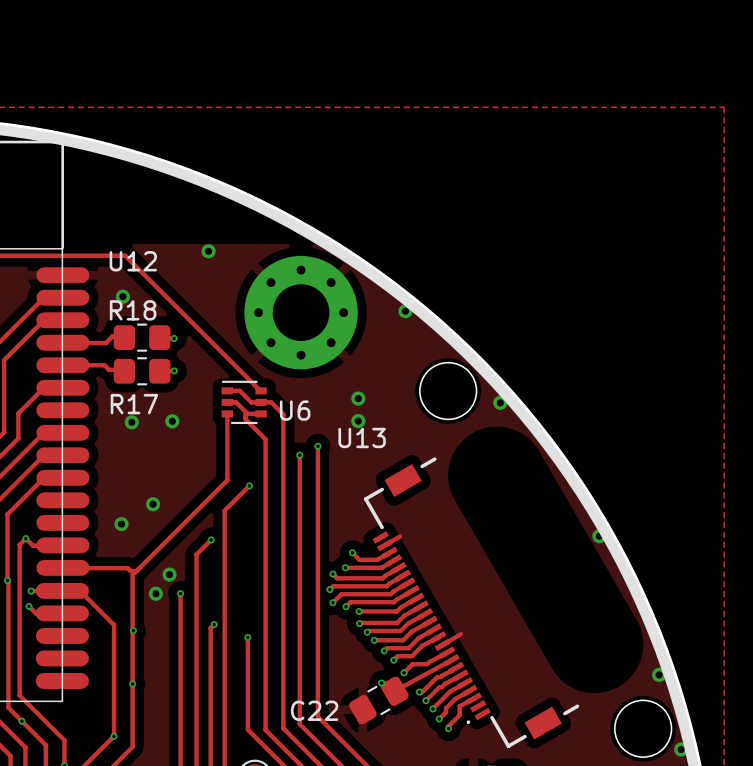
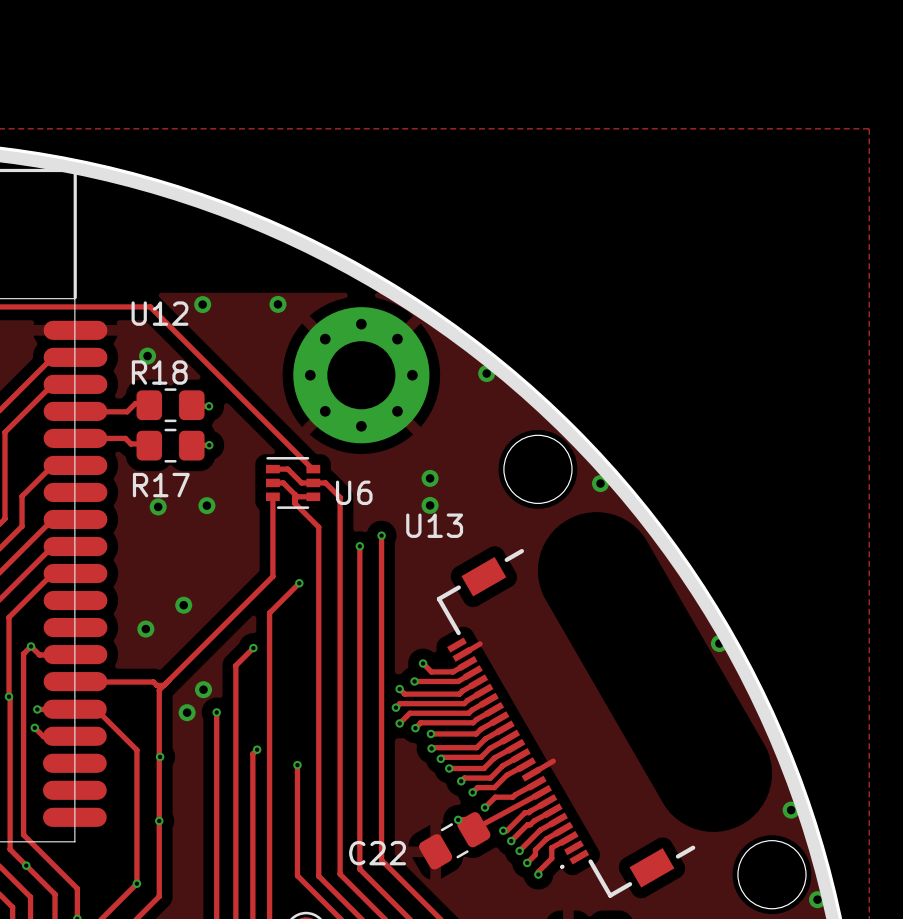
via: (208, 251) -> none
via: none -> (202, 304)
via: none -> (277, 304)

